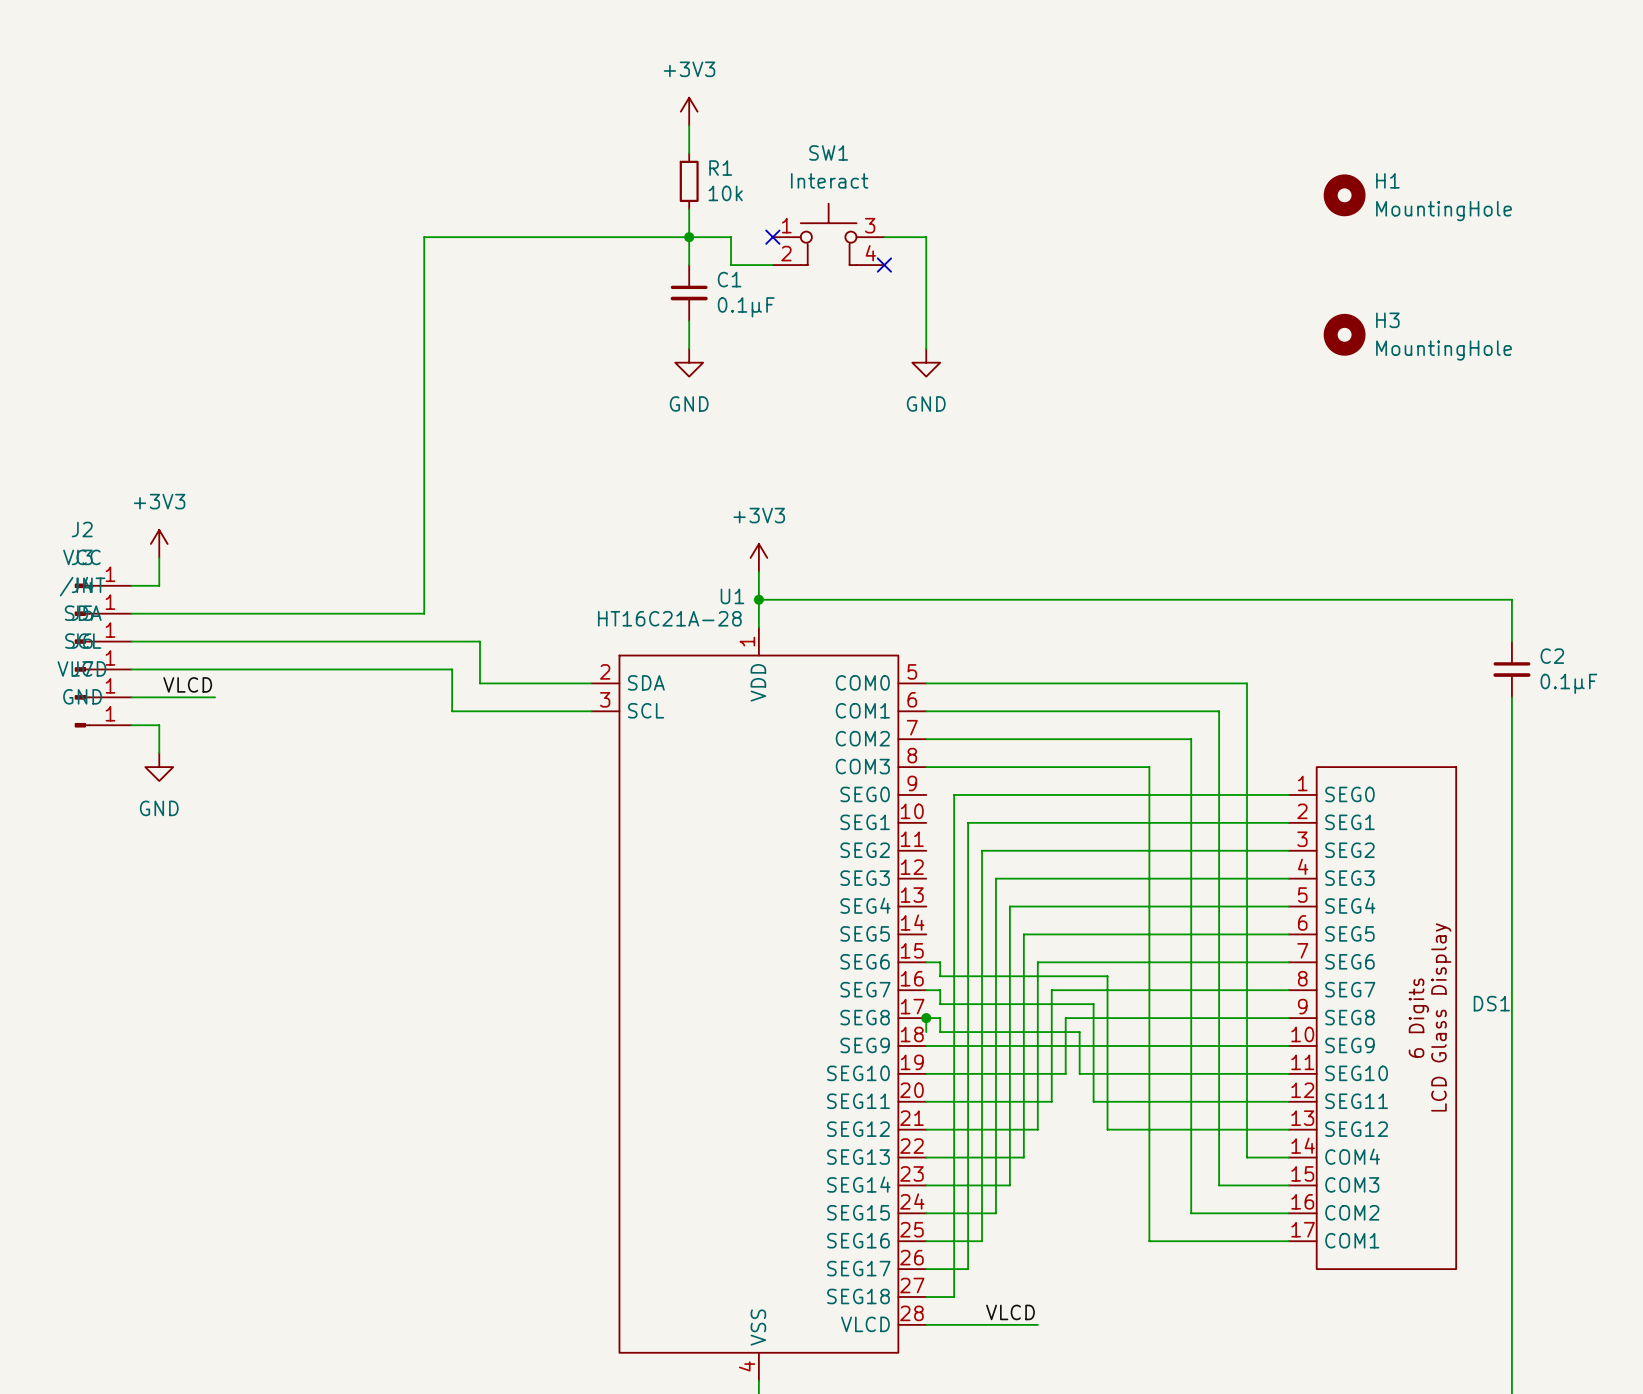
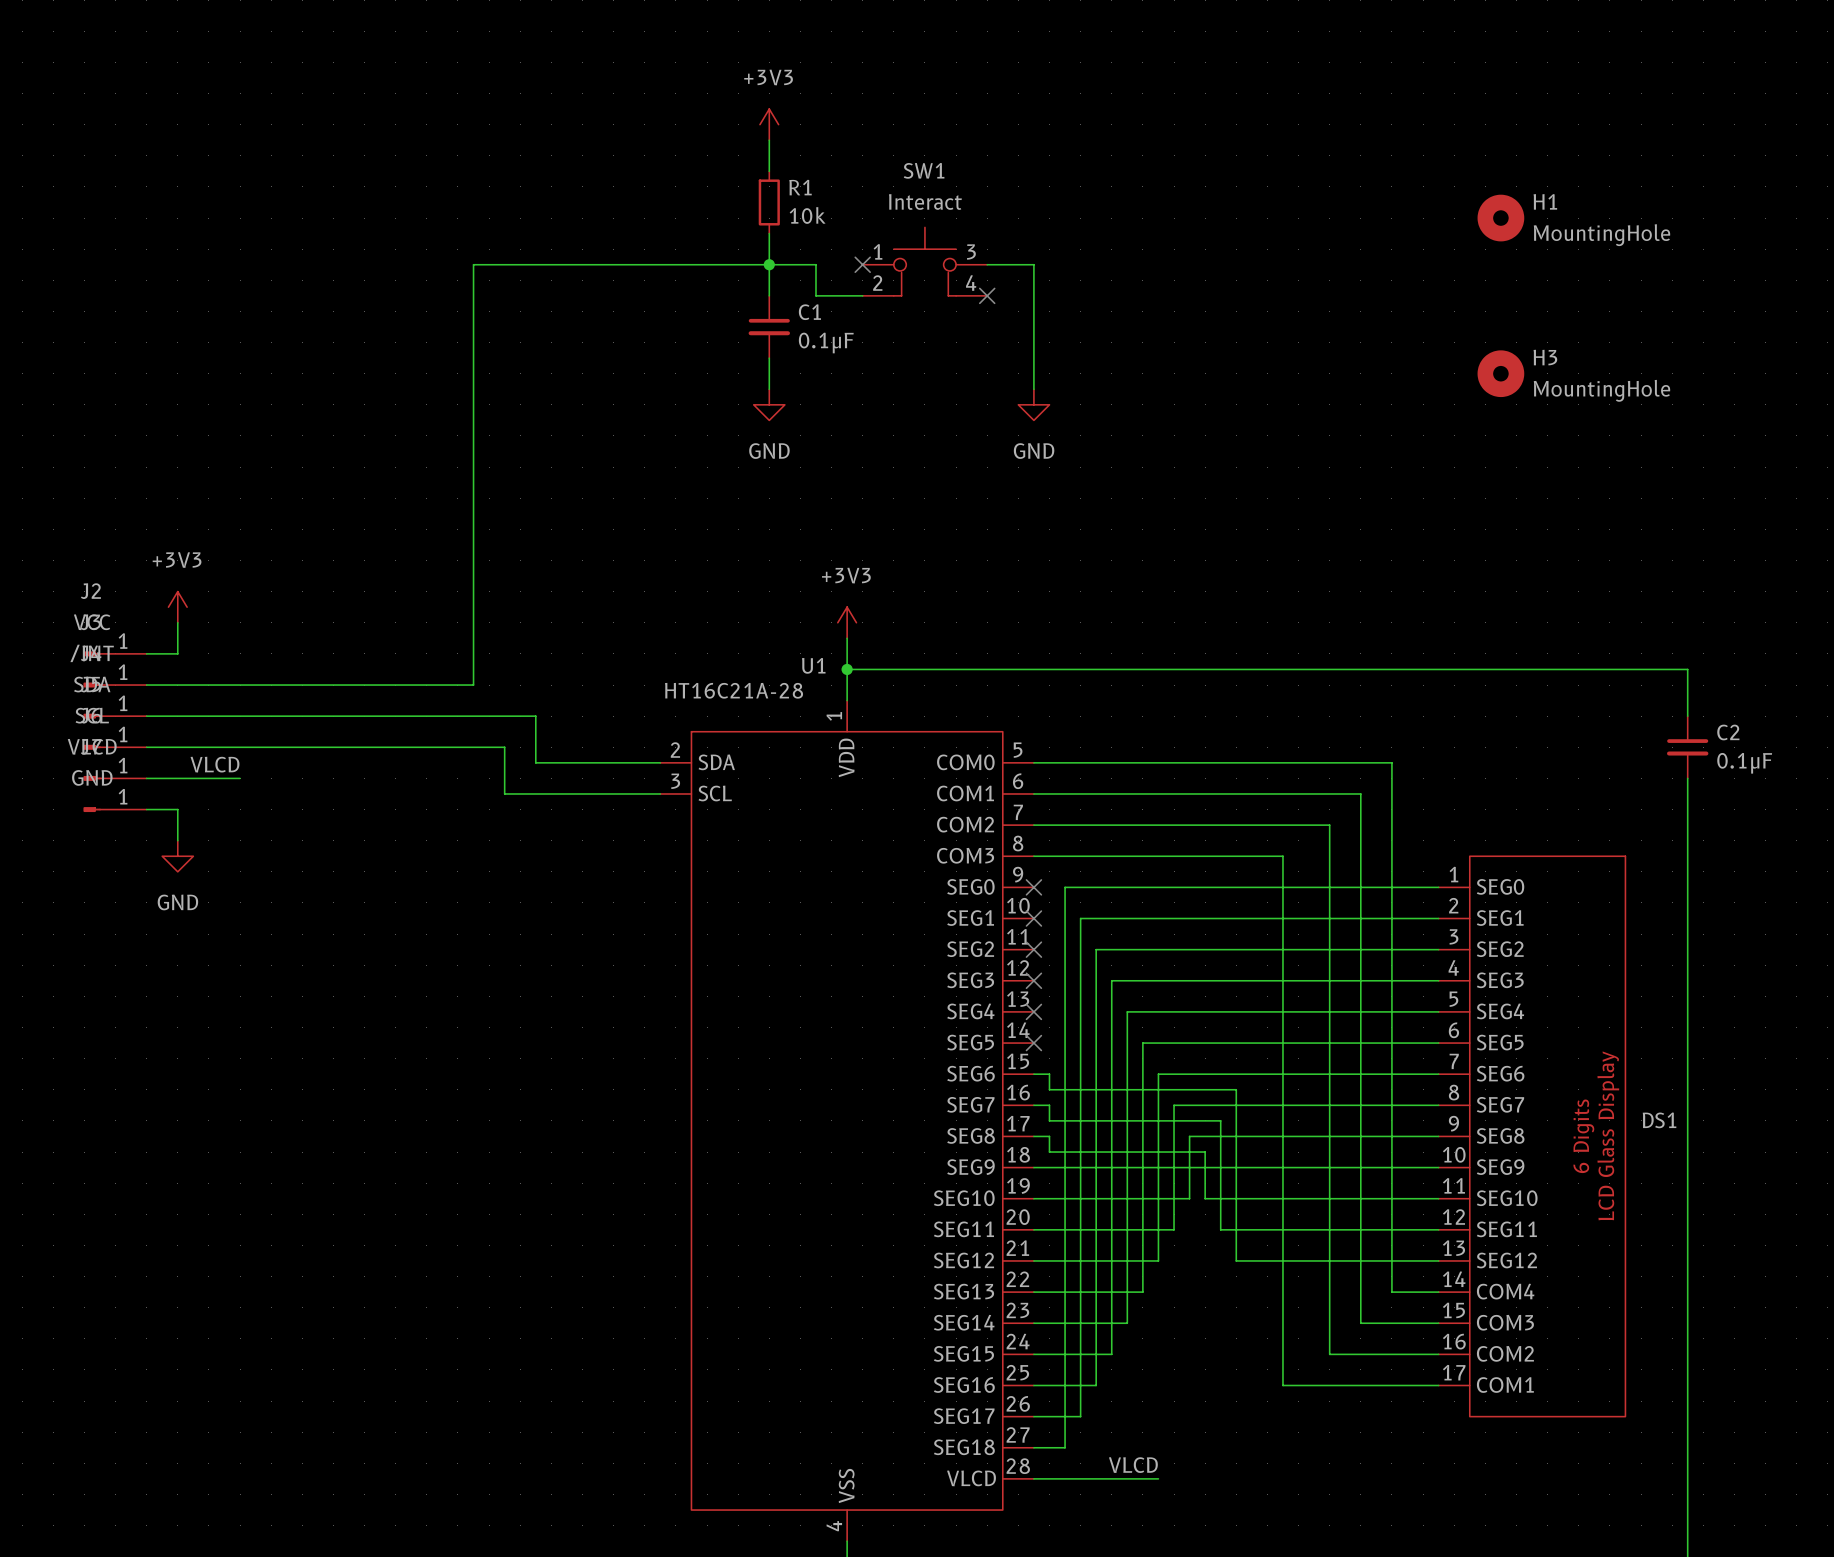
no-connect mark: none -> (1033, 887)
no-connect mark: none -> (1033, 918)
no-connect mark: none -> (1033, 949)
no-connect mark: none -> (1033, 980)
no-connect mark: none -> (1033, 1011)
no-connect mark: none -> (1033, 1043)
wire: (926, 1018) (926, 1032) -> none
junction: (926, 1018) -> none

